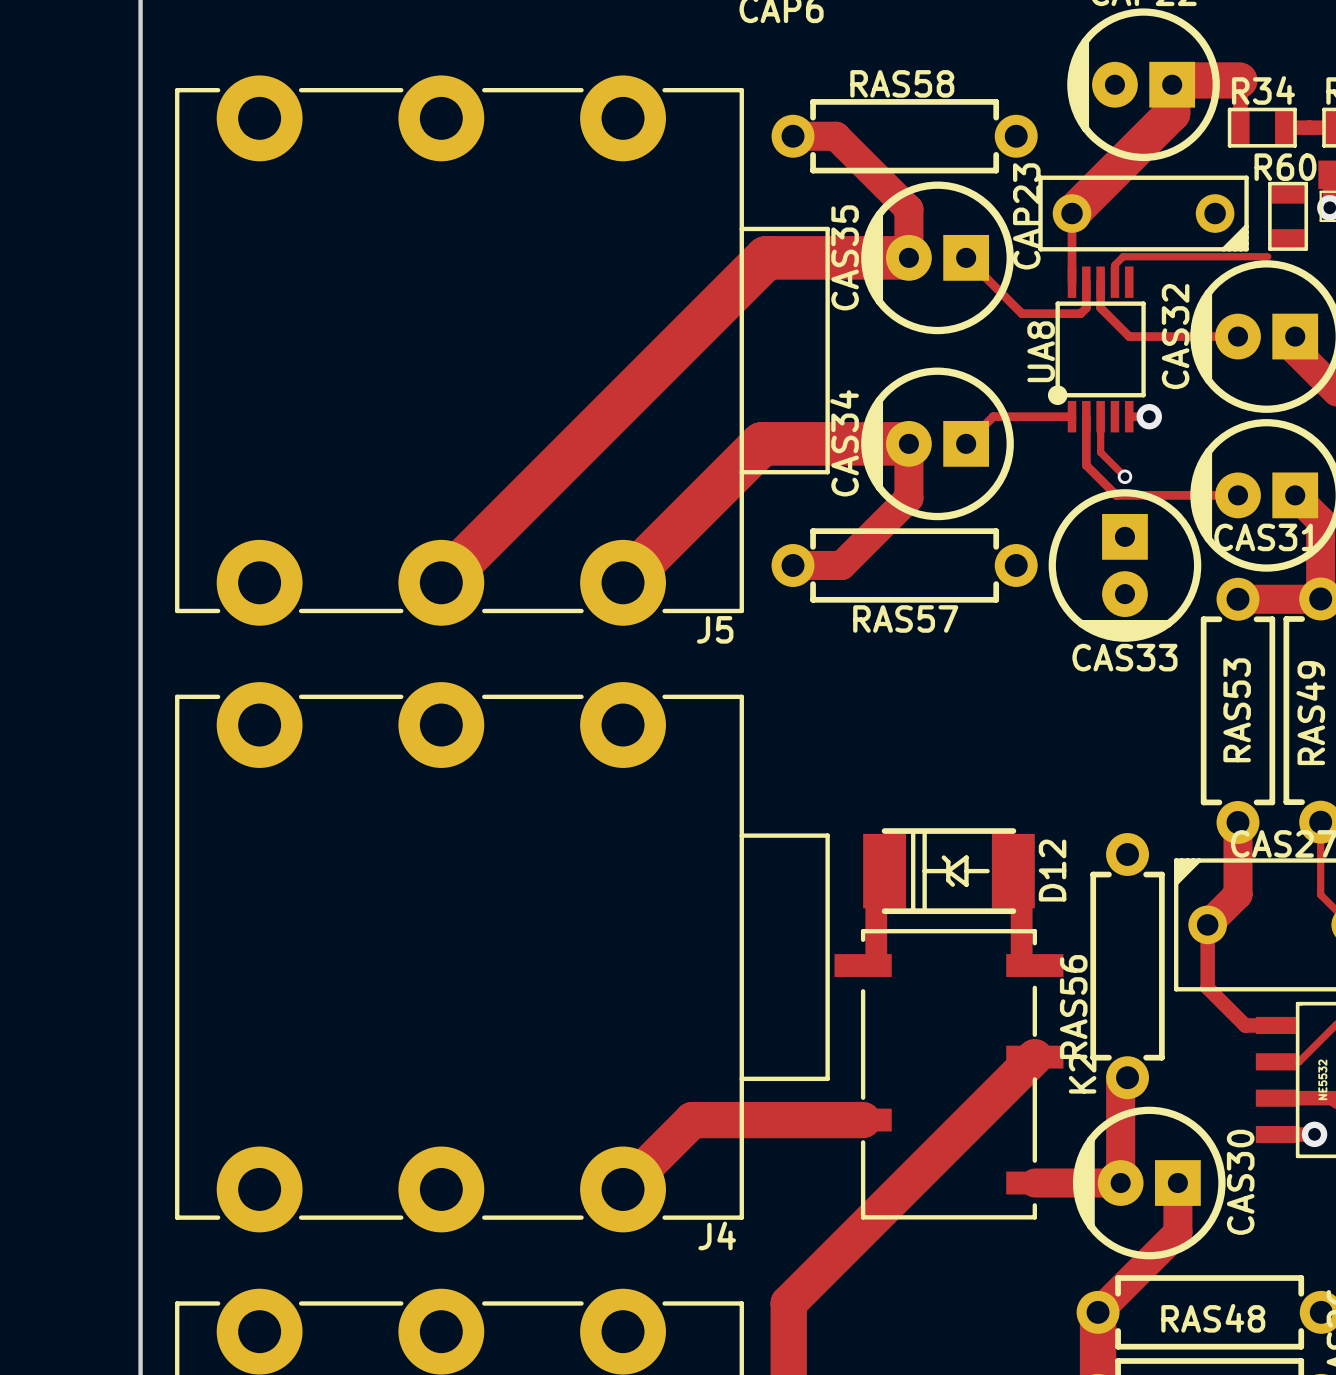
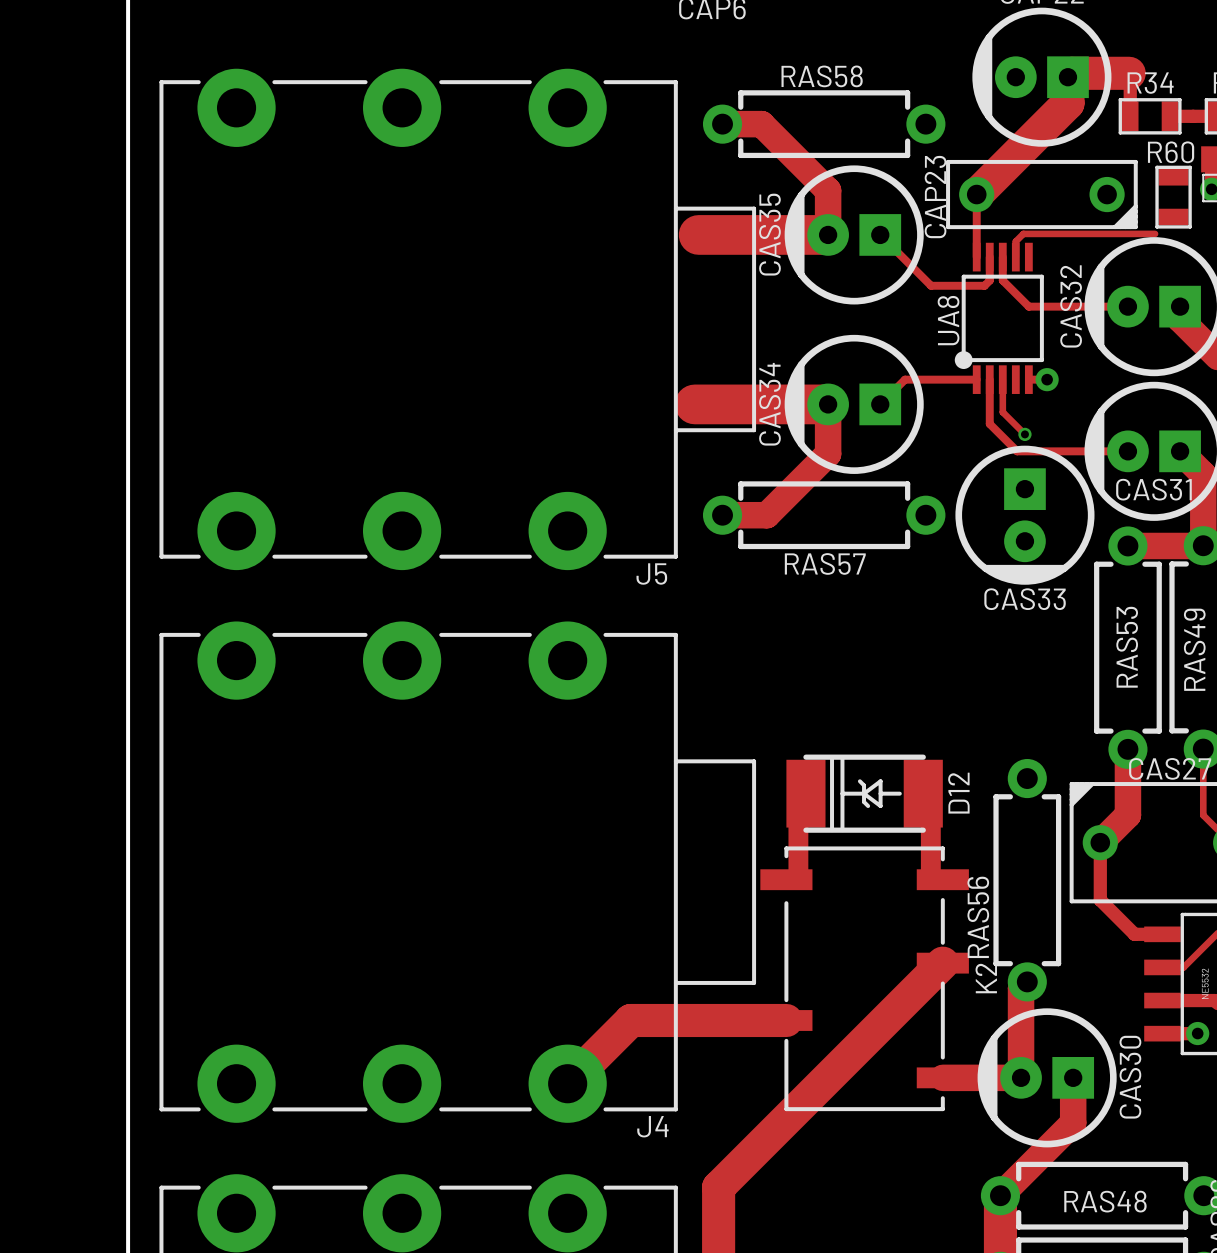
track: (766, 257) (441, 582) -> none
track: (761, 443) (623, 582) -> none

